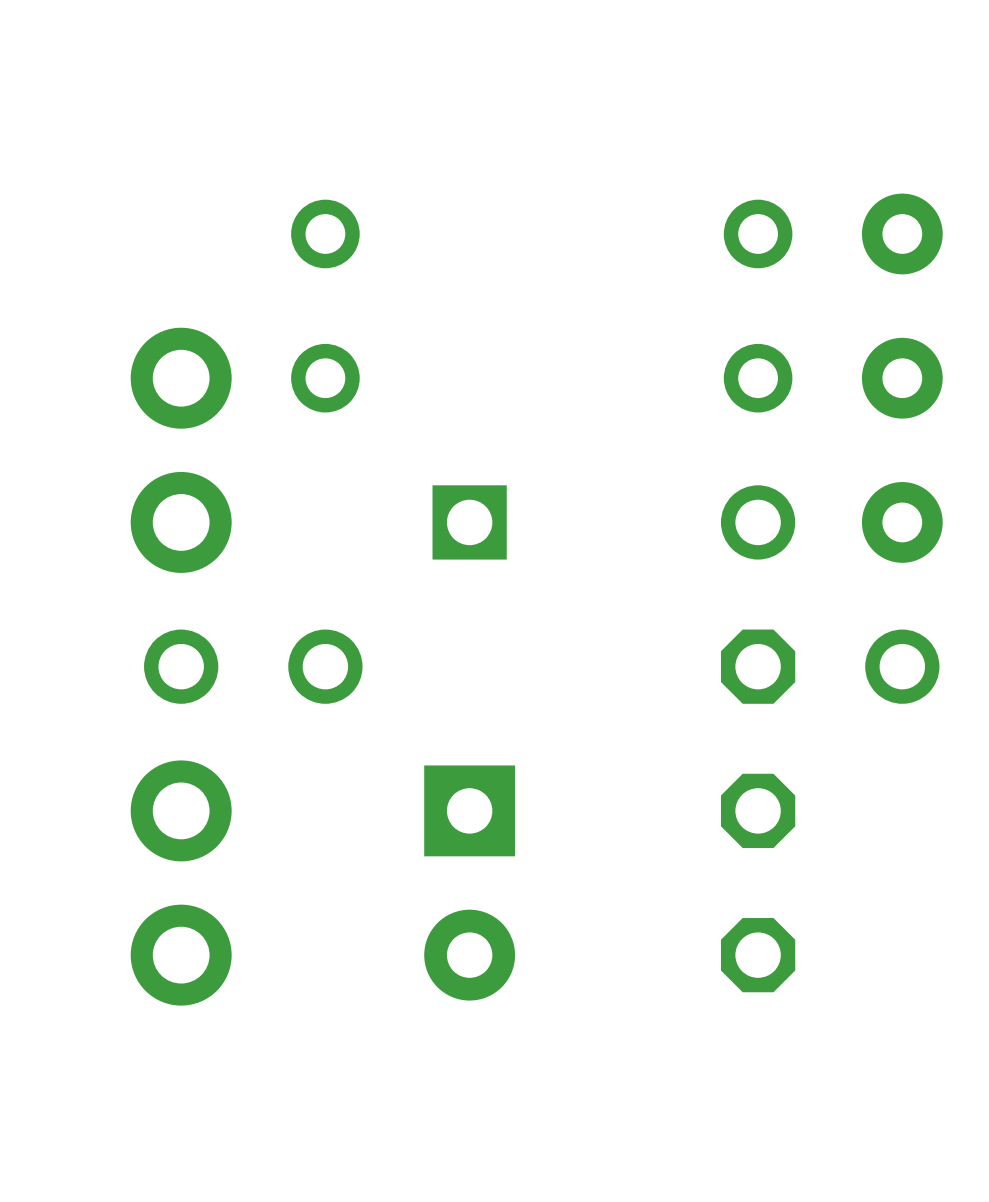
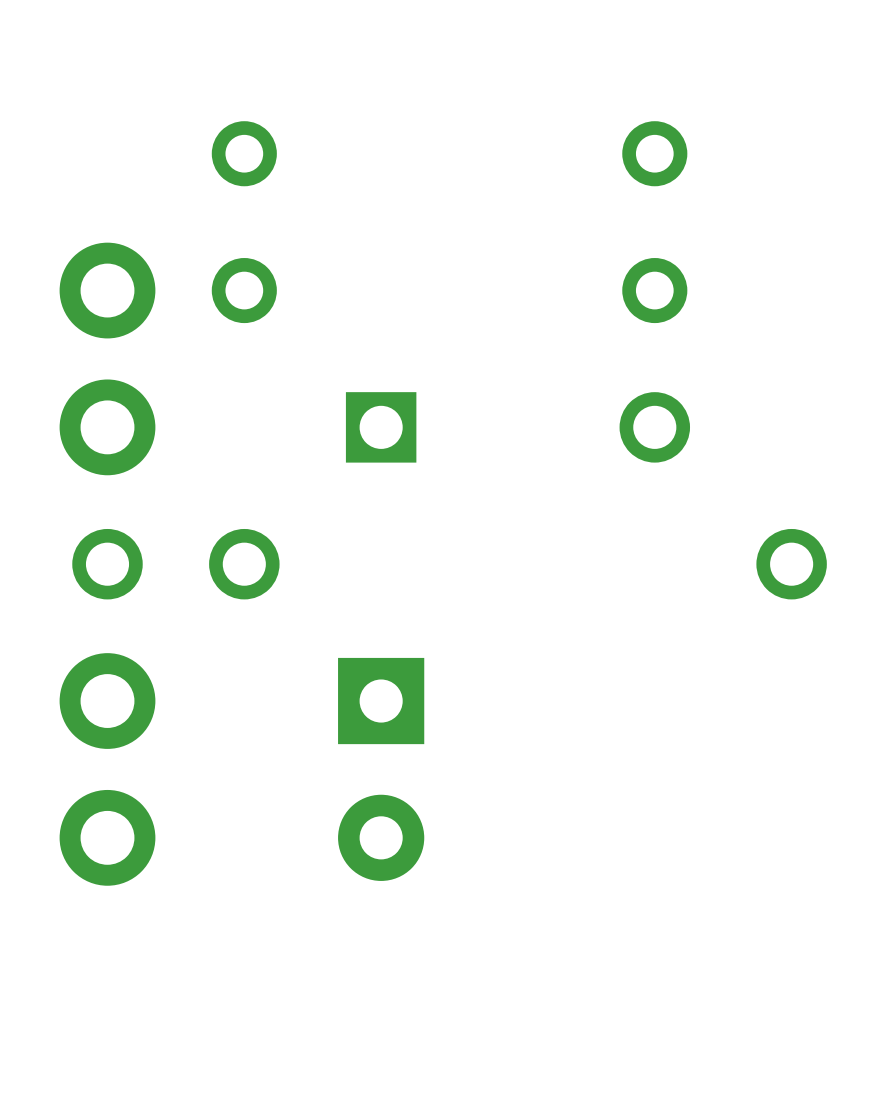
part: (902, 378) -> none
part: (758, 810) -> none

